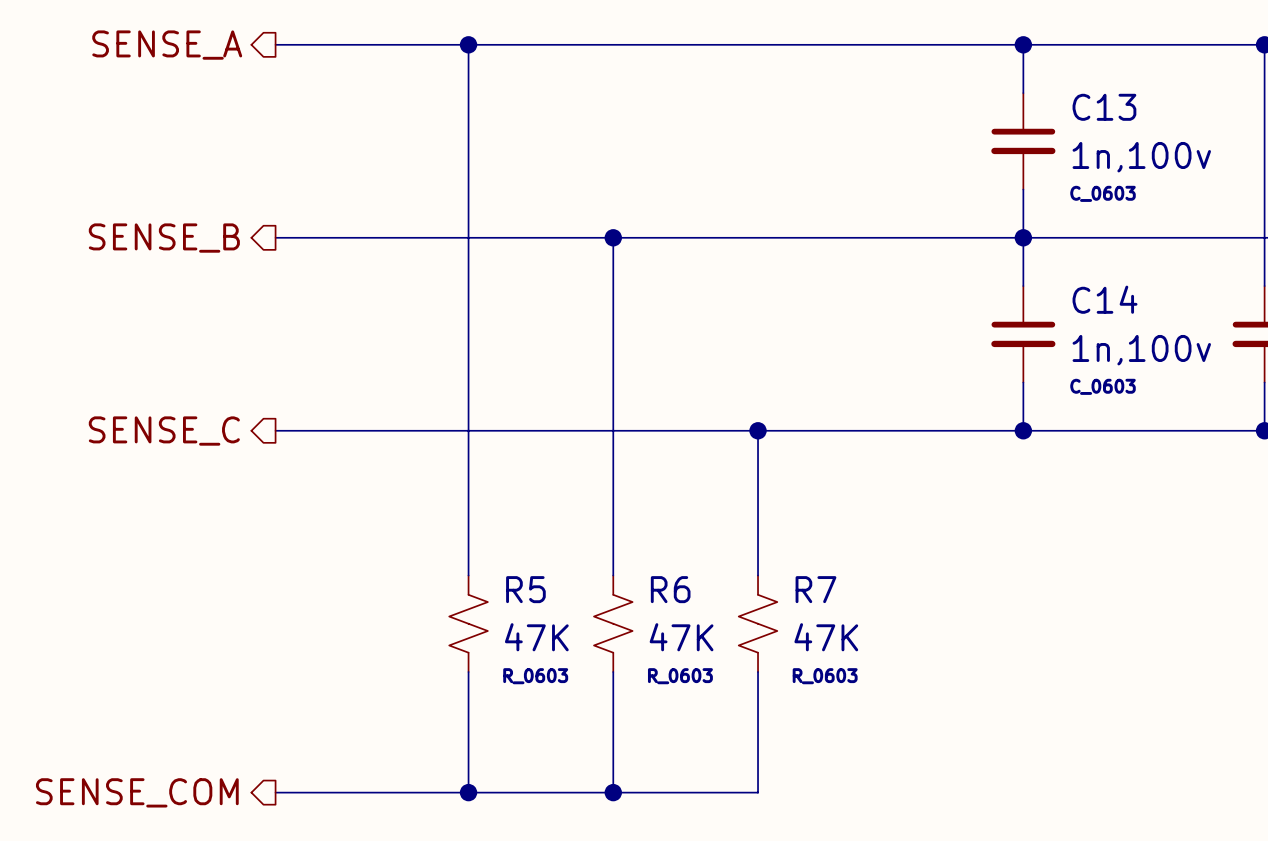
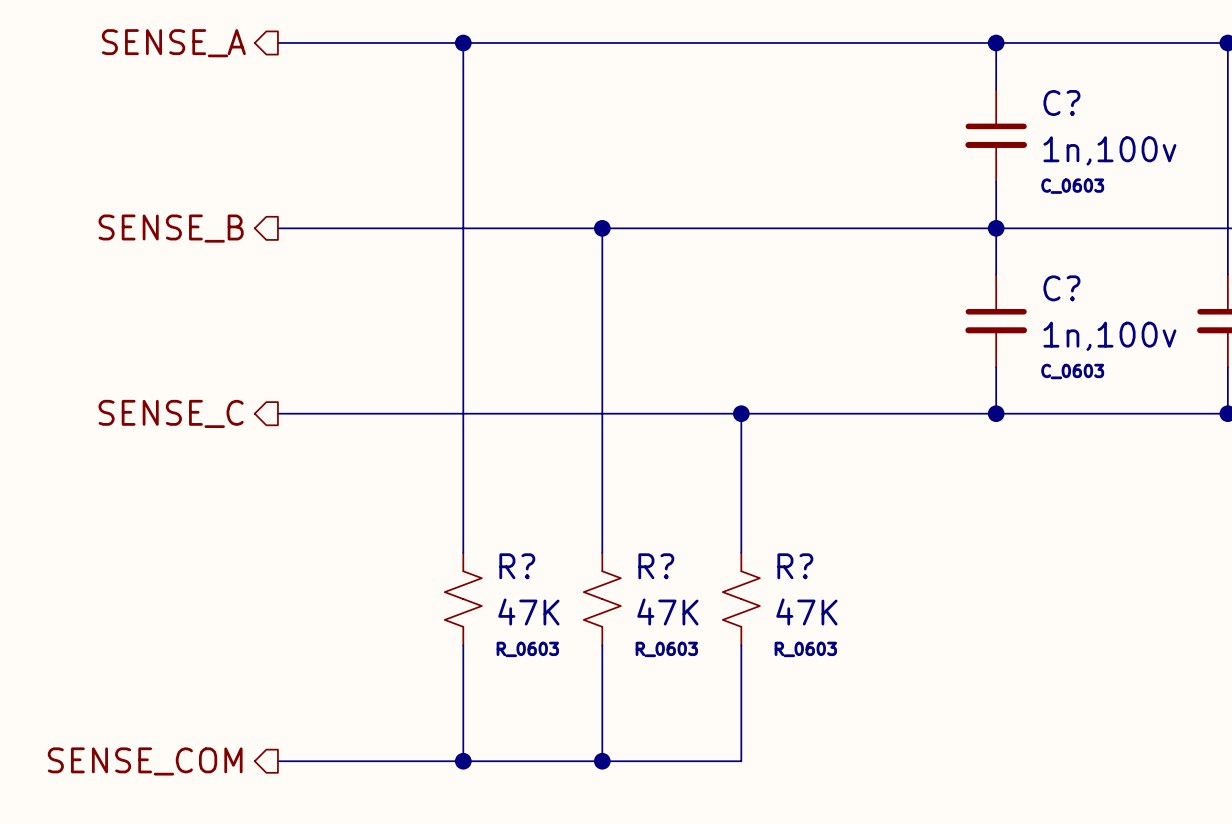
C13 name: C13 (1104, 107) -> C? (1061, 103)
C14 name: C14 (1105, 299) -> C? (1061, 288)
R5 name: R5 (525, 589) -> R? (517, 566)
R6 name: R6 (670, 589) -> R? (656, 566)
R7 name: R7 (815, 589) -> R? (795, 566)

